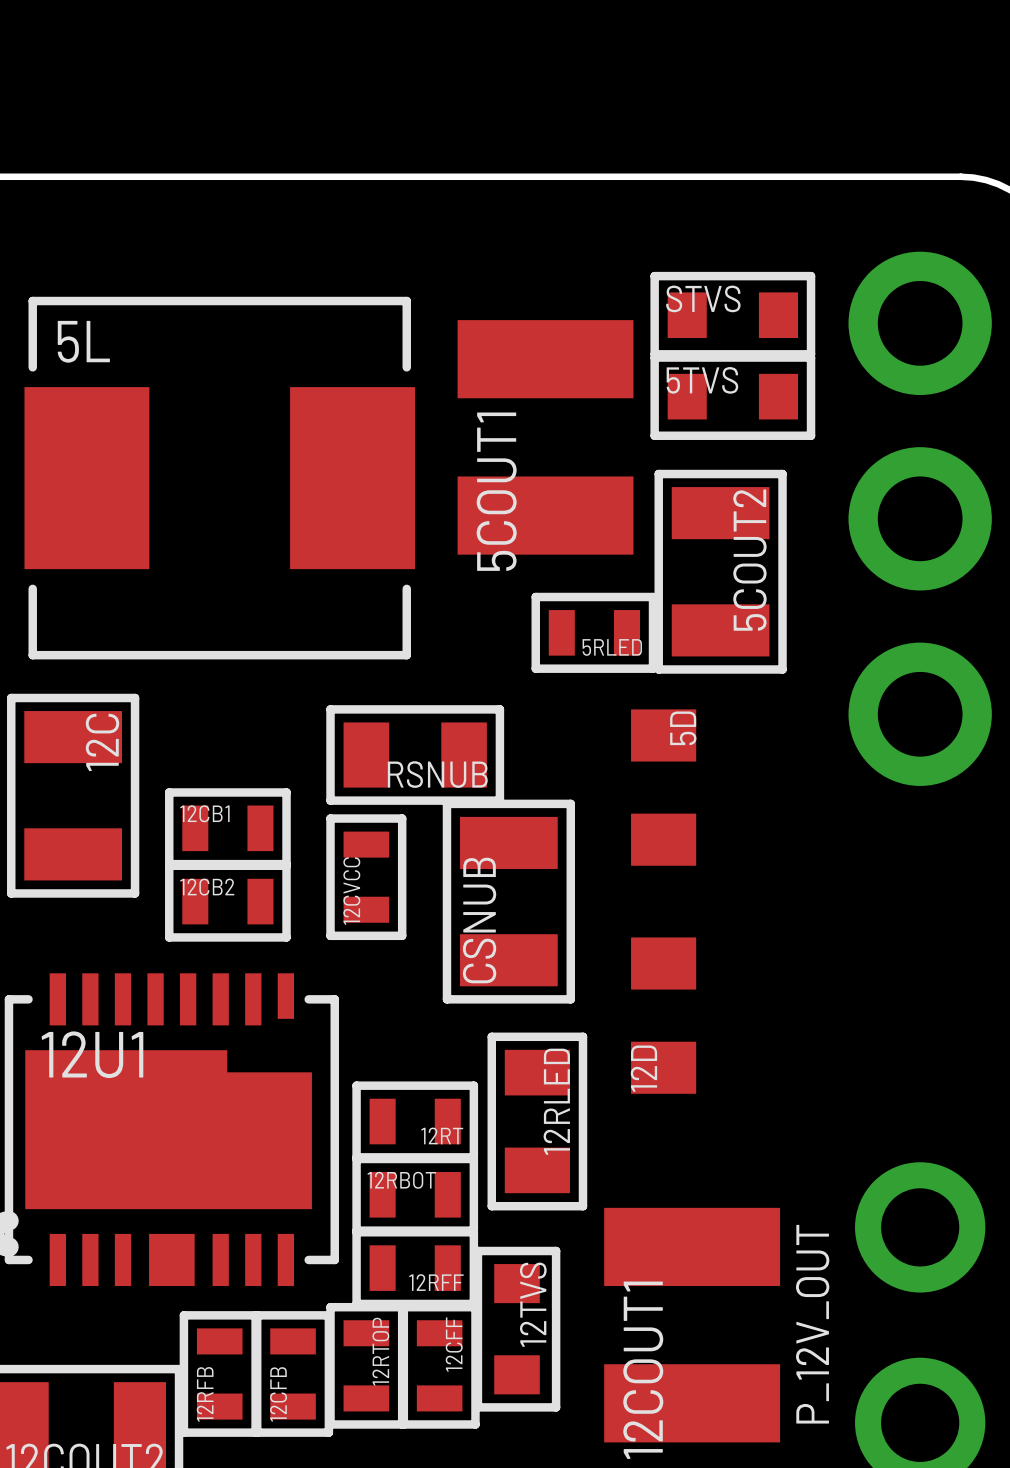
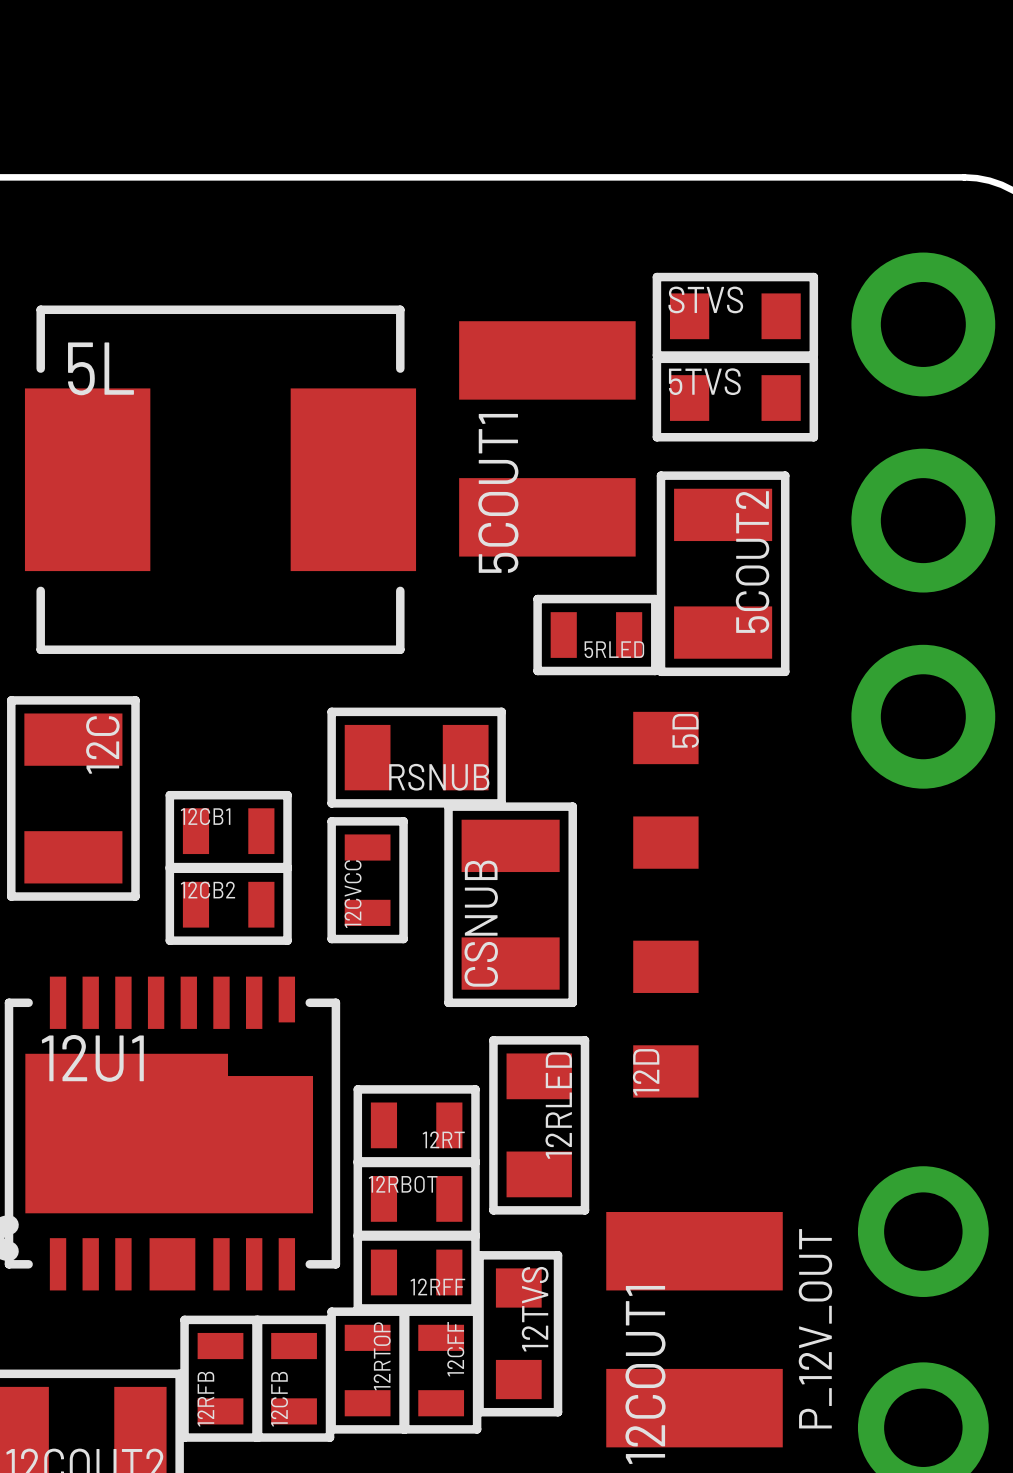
5L footprint: [24, 296, 416, 660] -> [24, 305, 417, 654]
5L name position: 5L (83, 341) -> 5L (100, 368)

